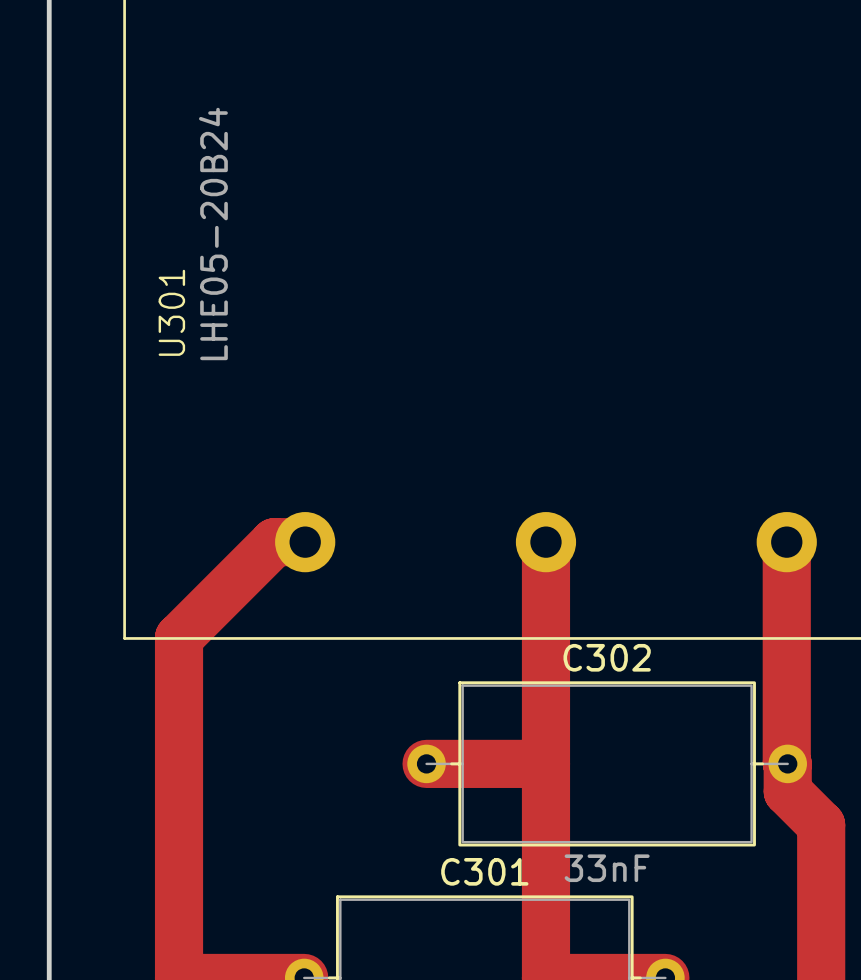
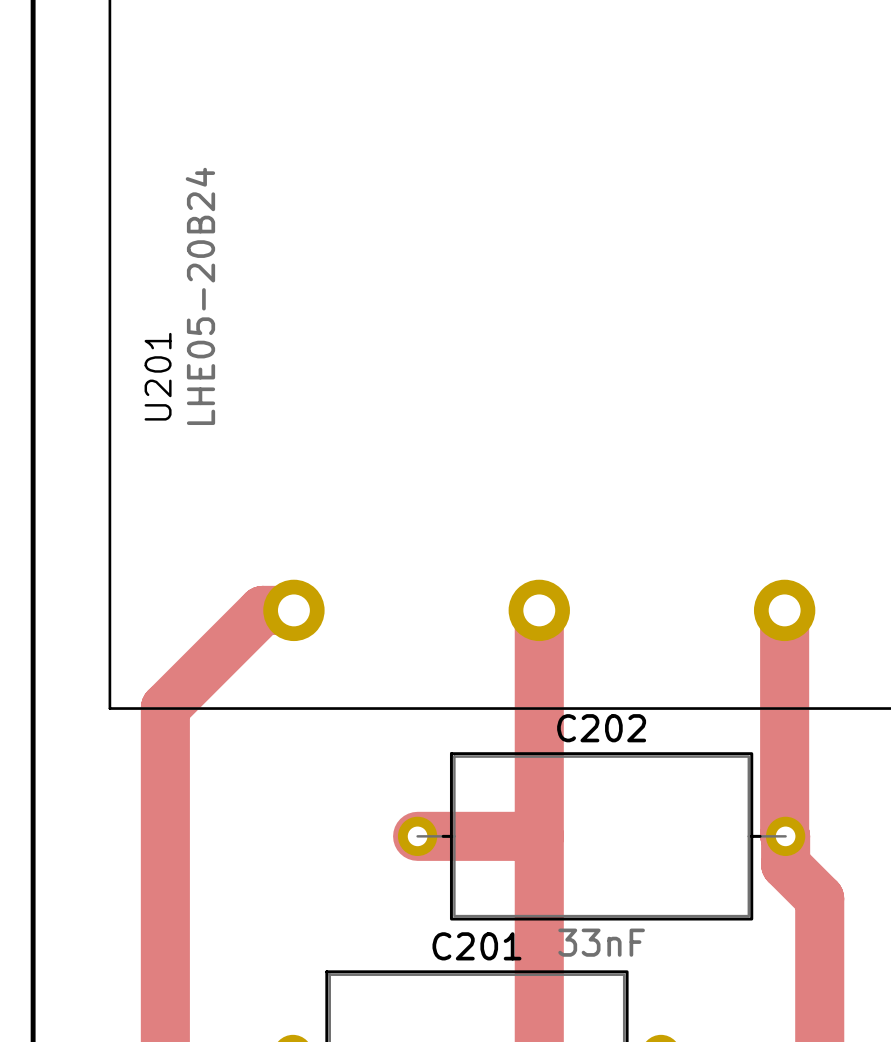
U301 name: U301 (171, 312) -> U201 (158, 376)
C302 name: C302 (607, 657) -> C202 (601, 728)
C301 name: C301 (484, 871) -> C201 (476, 946)

